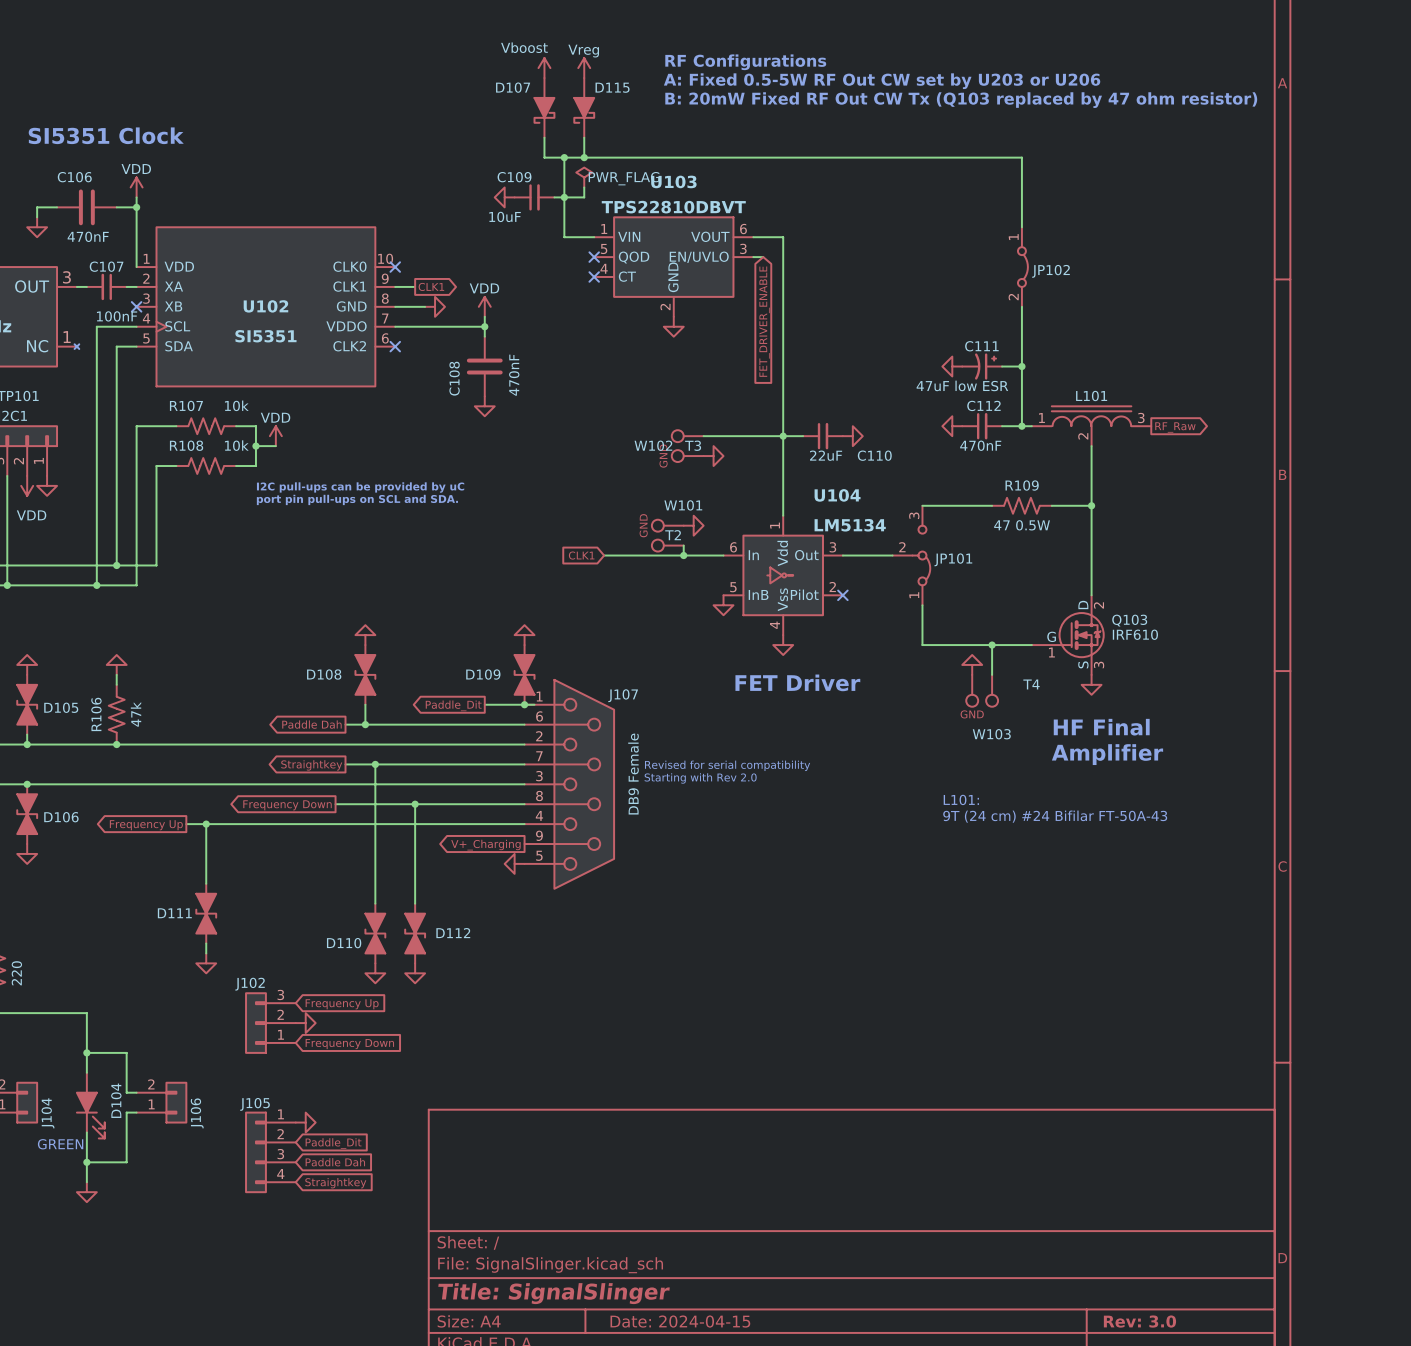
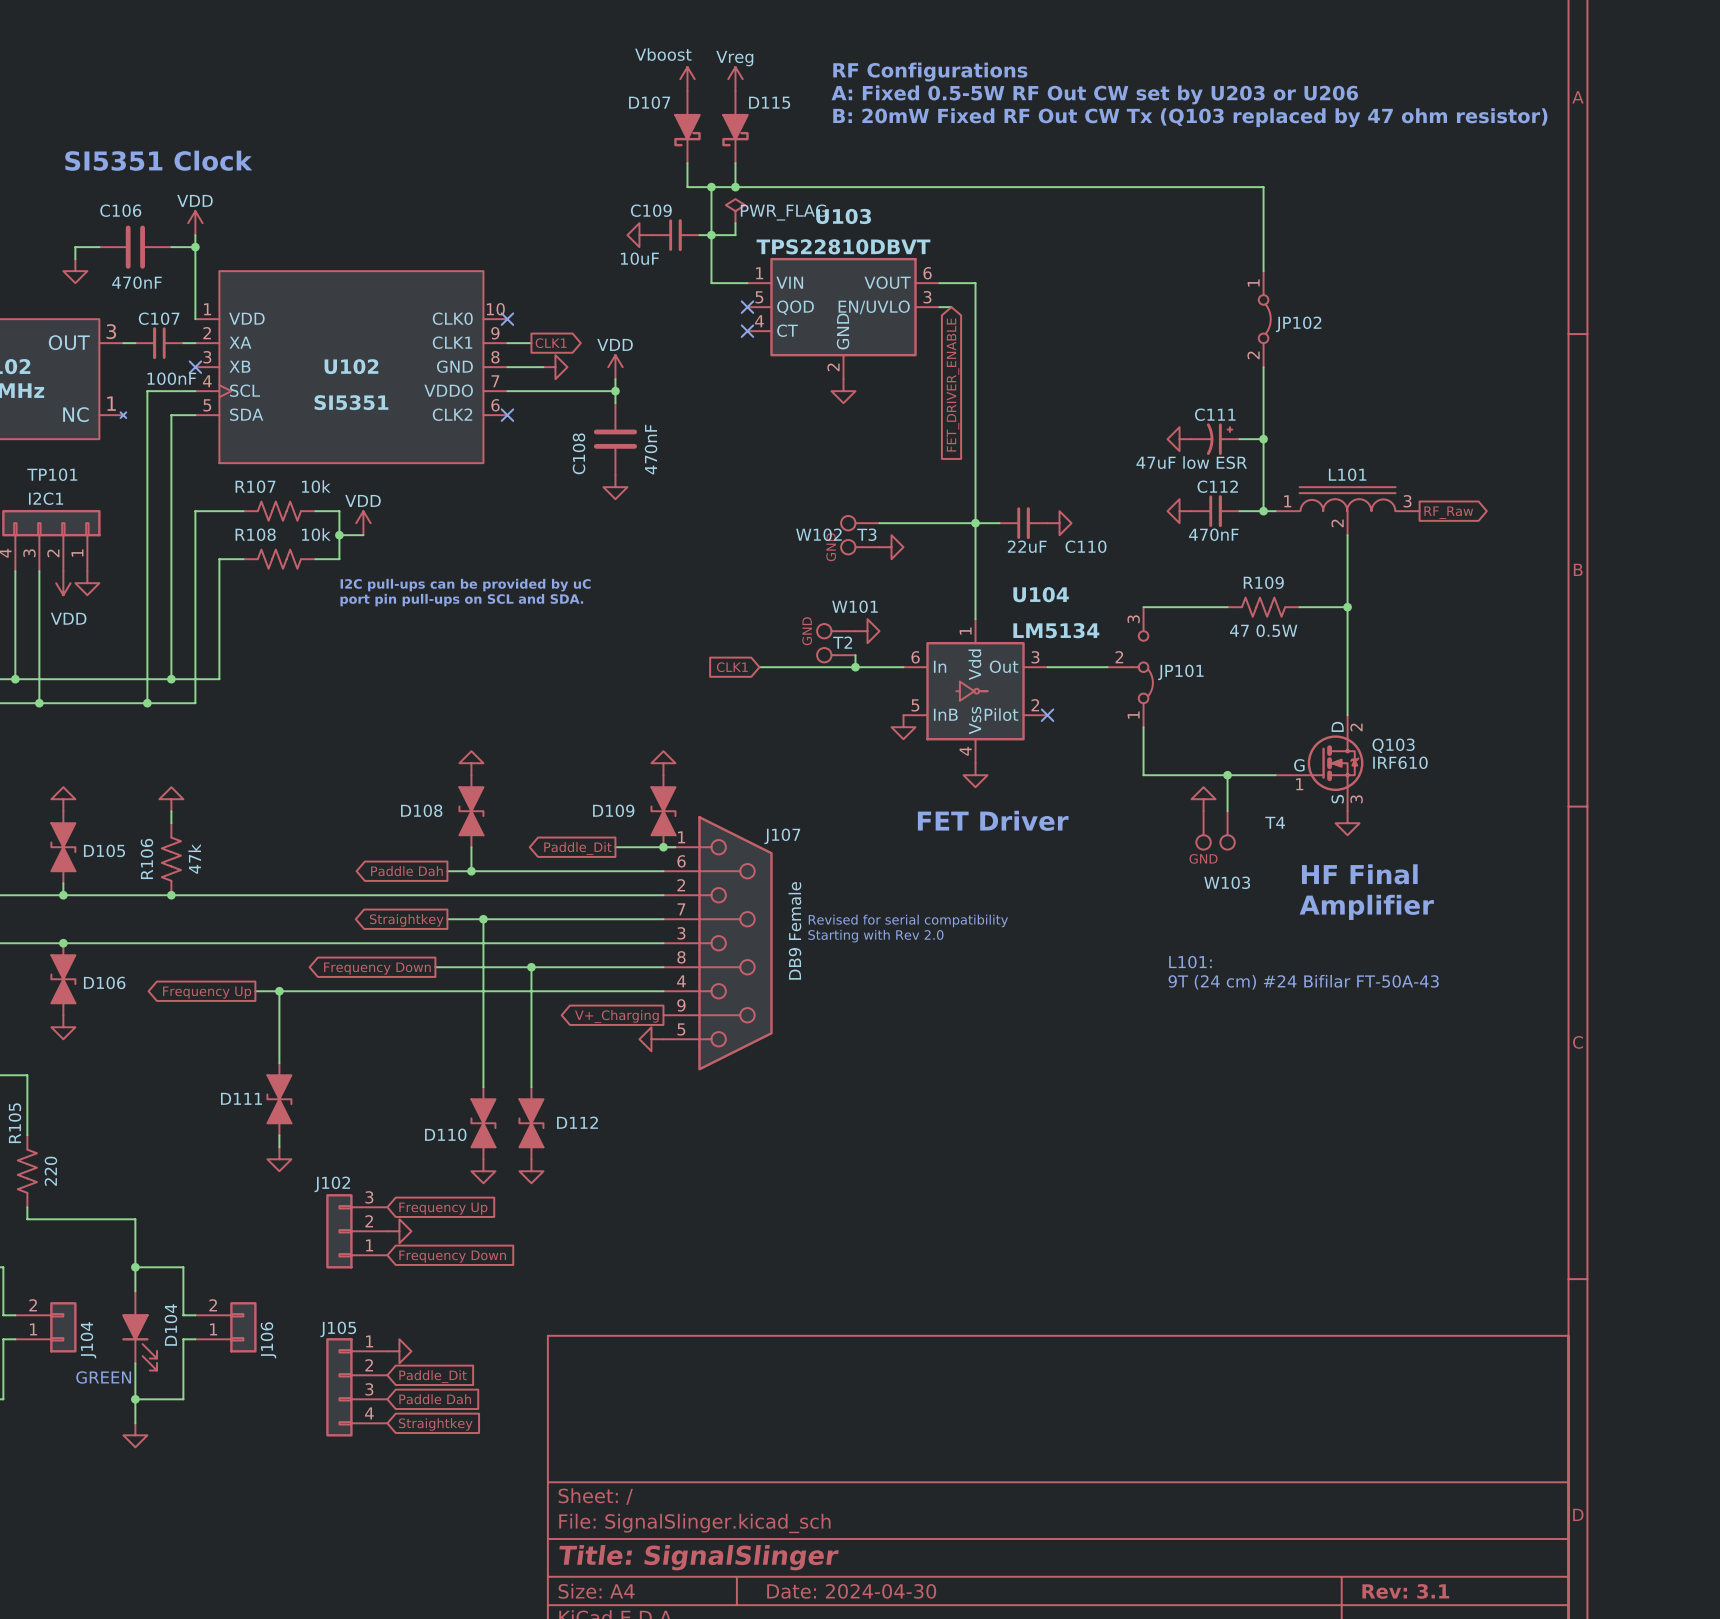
title block: Date: 2024-04-15 (680, 1321) -> Date: 2024-04-30 (851, 1591)
title block: Rev: 3.0 (1139, 1321) -> Rev: 3.1 (1405, 1591)

